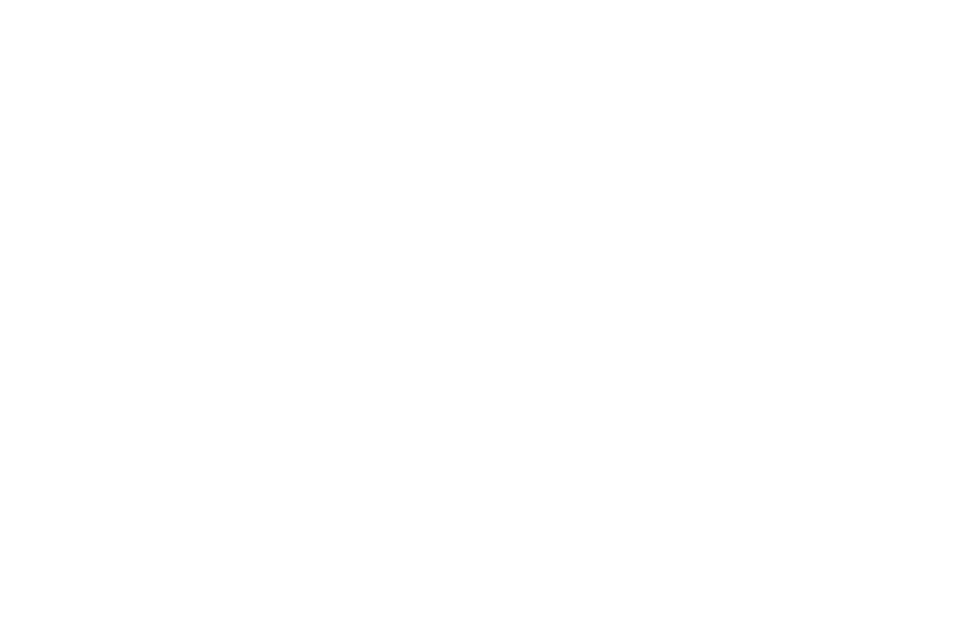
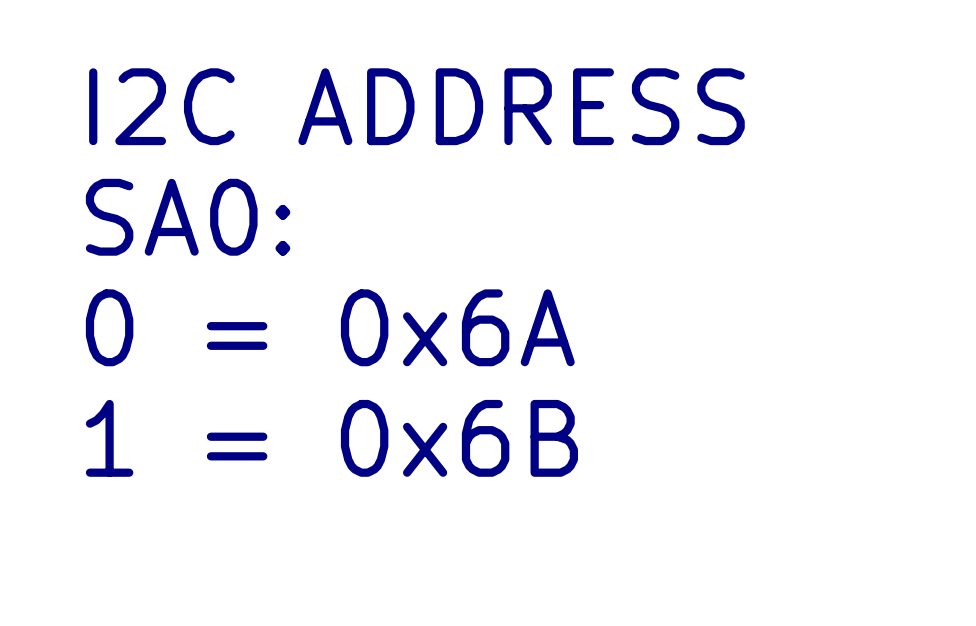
text: none -> I2C ADDRESS (416, 106)
text: none -> SA0: (188, 217)
text: none -> 0 = 0x6A (330, 327)
text: none -> 1 = 0x6B (331, 438)

